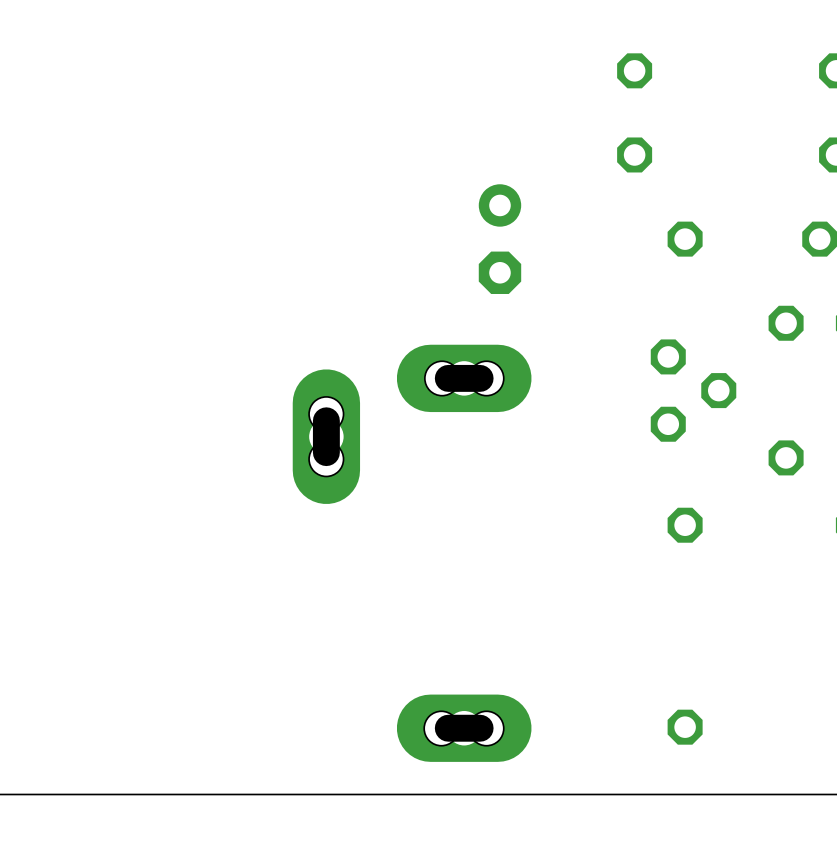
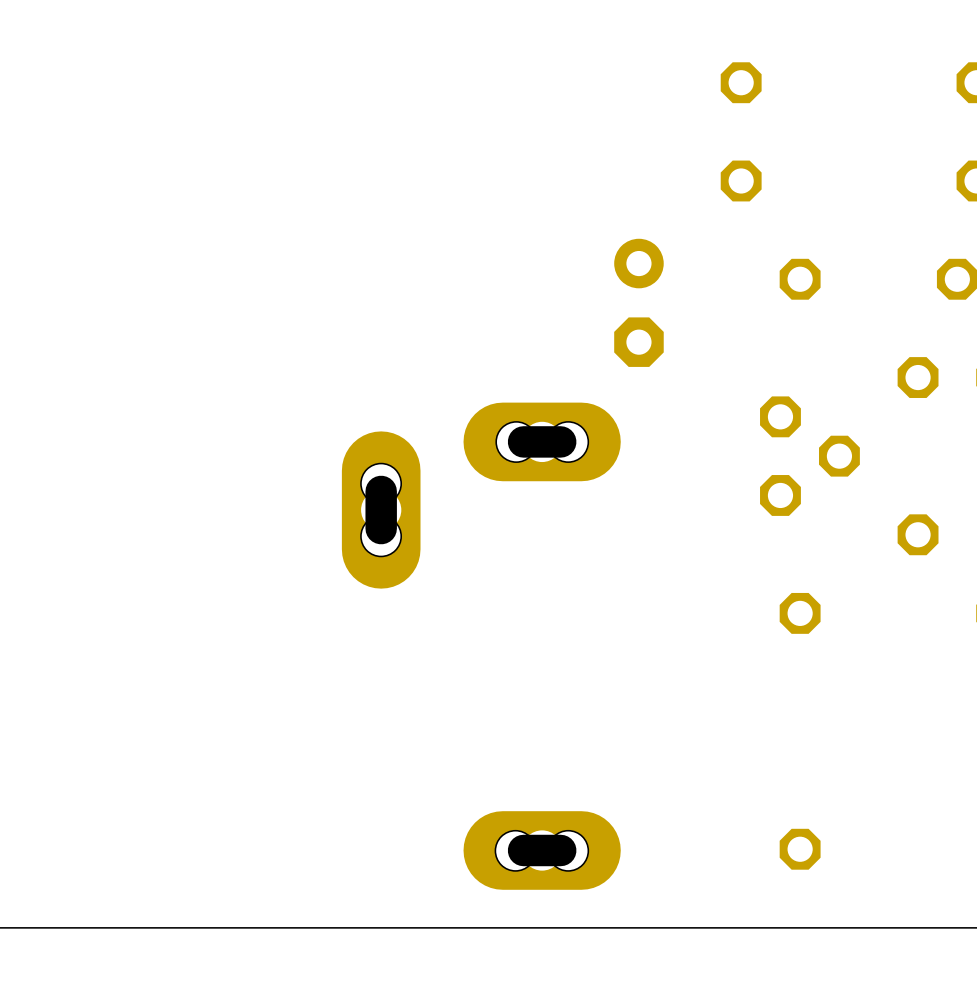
part position: (499, 239) -> (638, 302)

